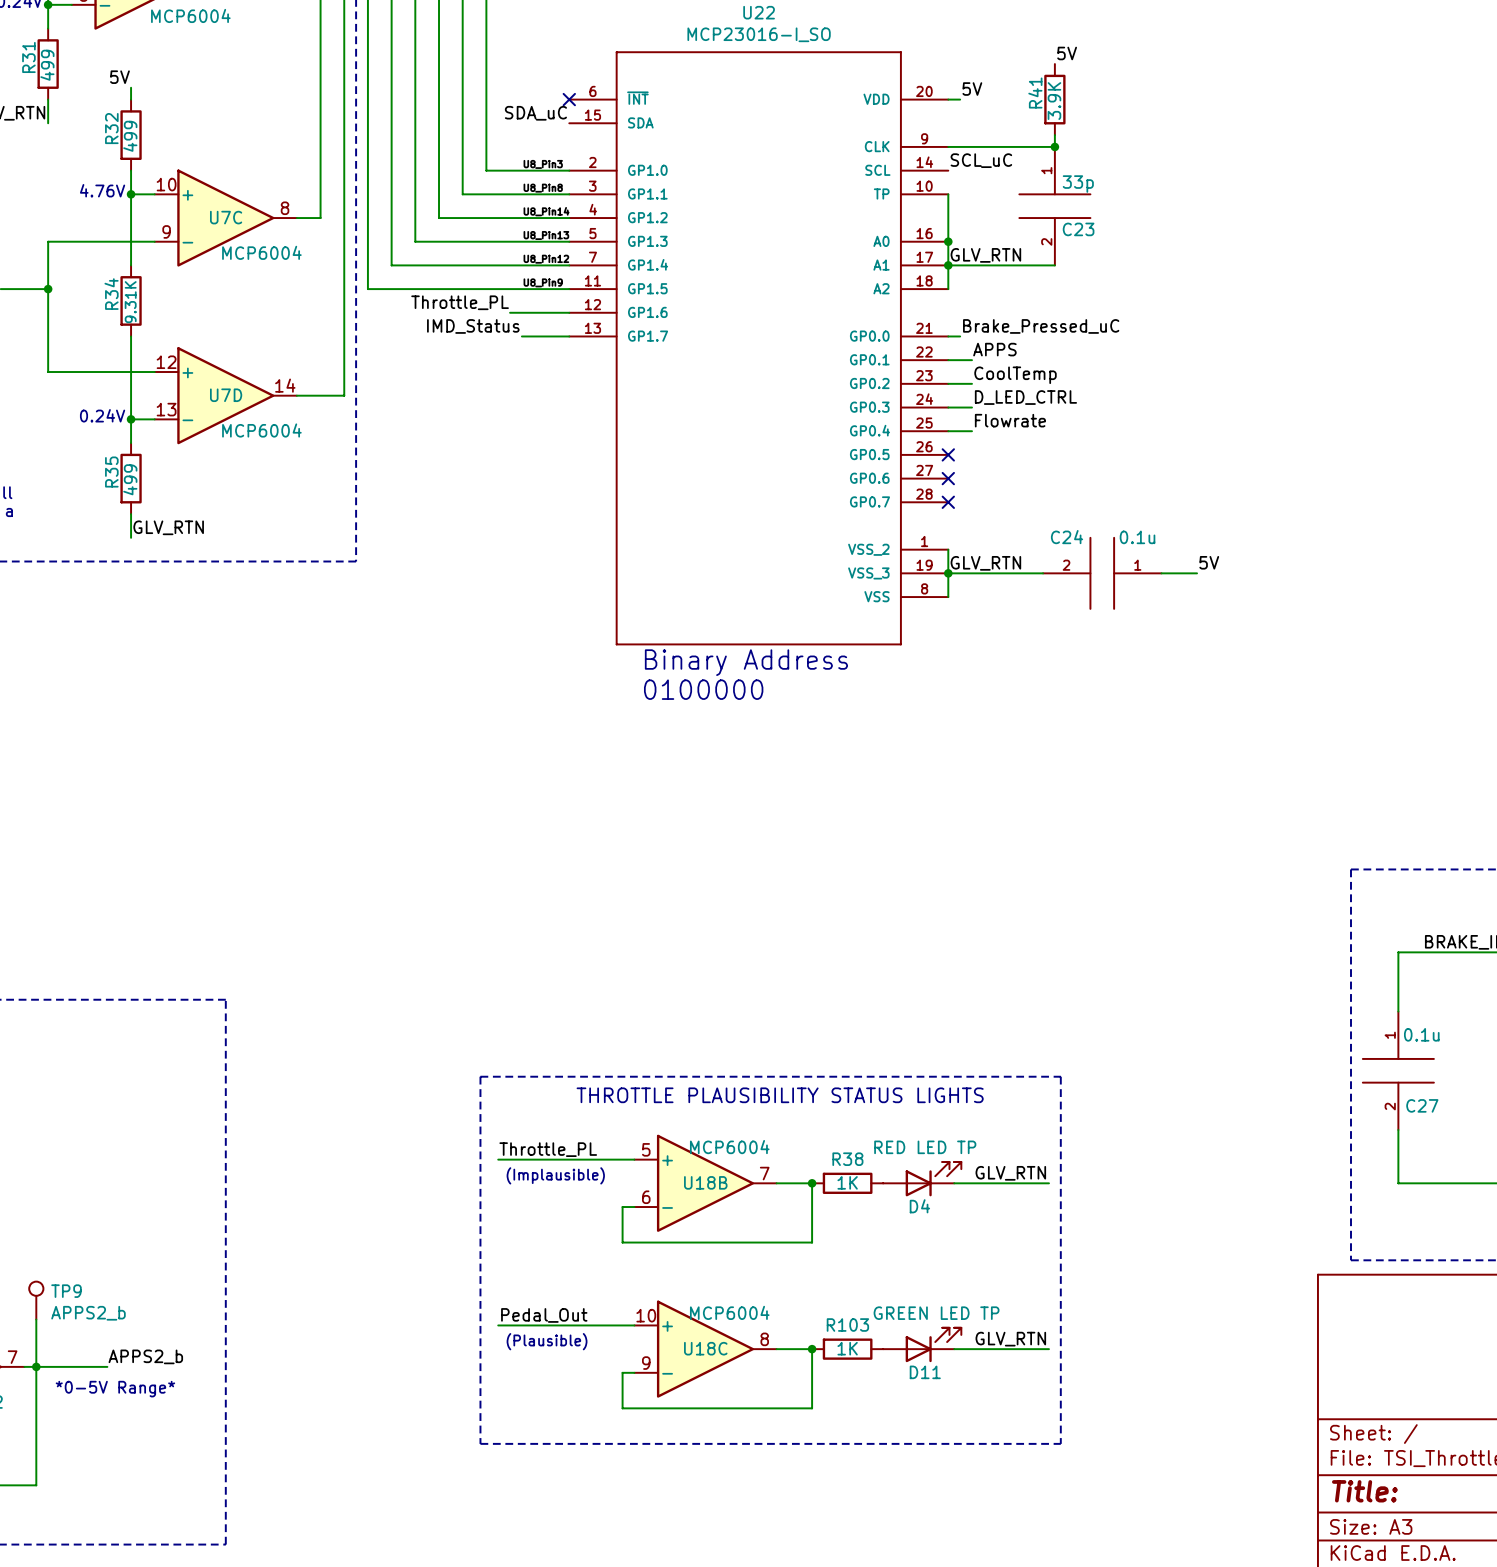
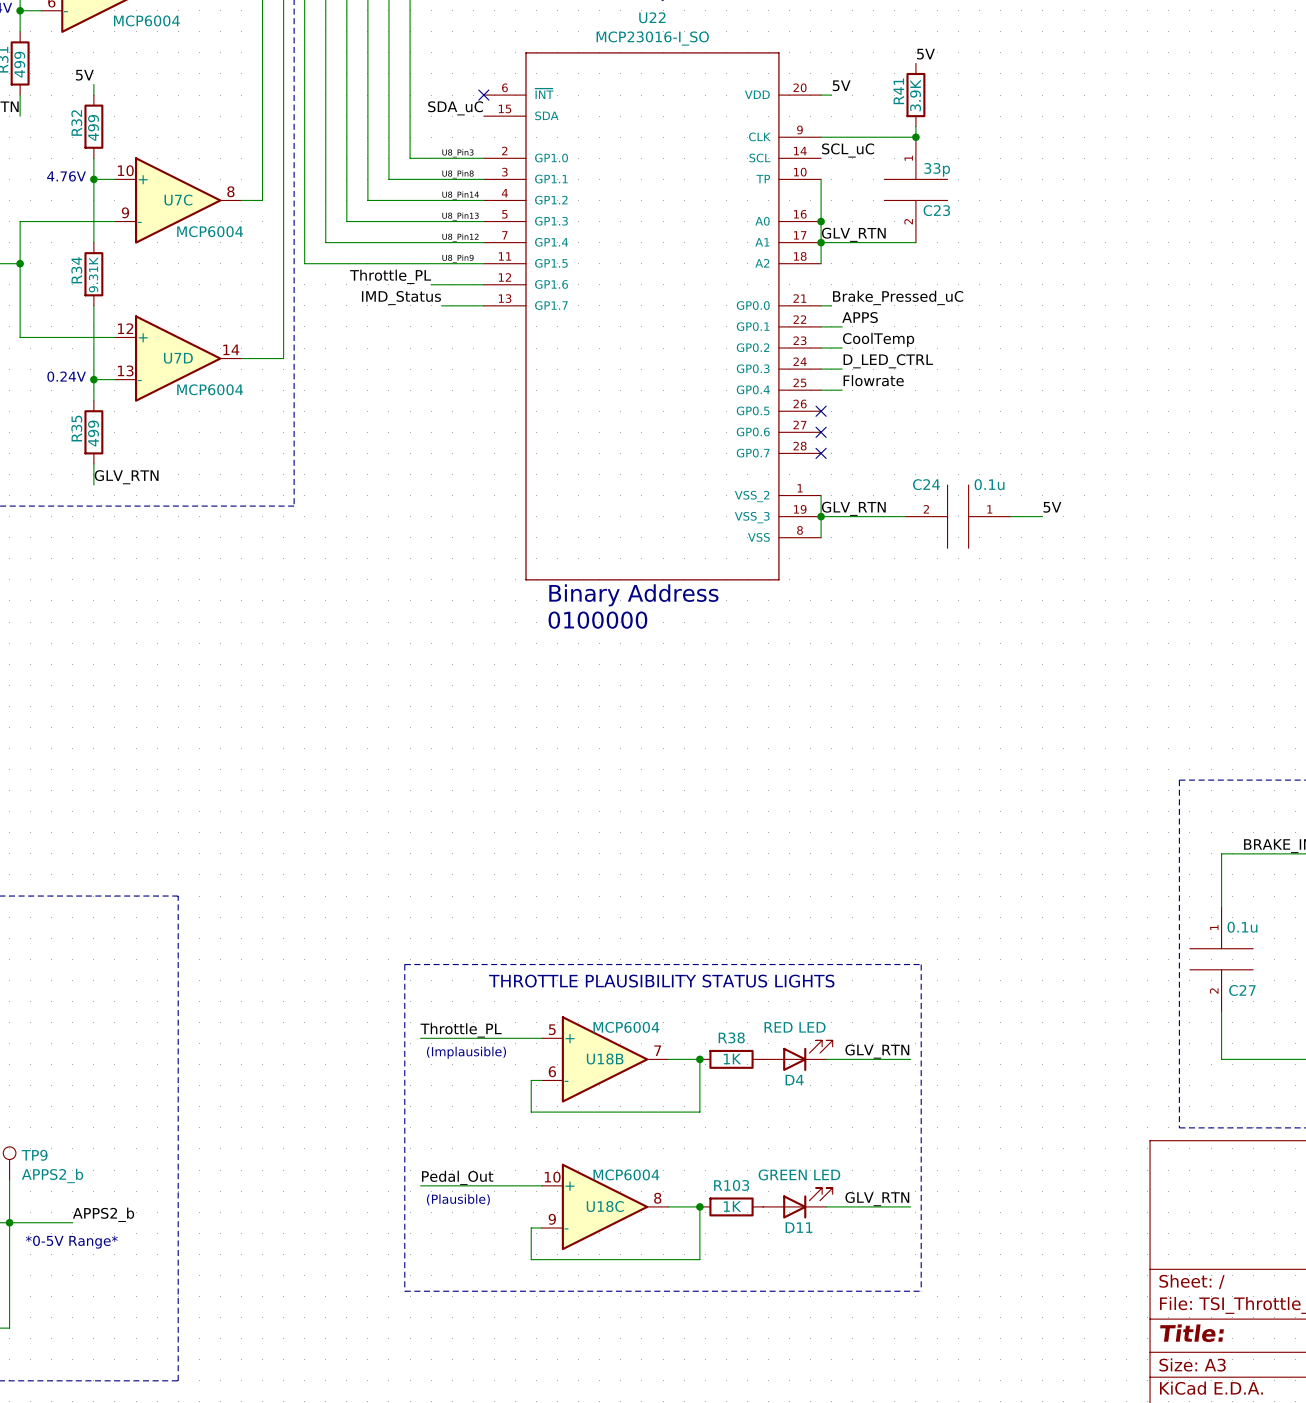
D4 value: RED LED TP (925, 1147) -> RED LED (795, 1027)
D11 value: GREEN LED TP (936, 1313) -> GREEN LED (799, 1174)

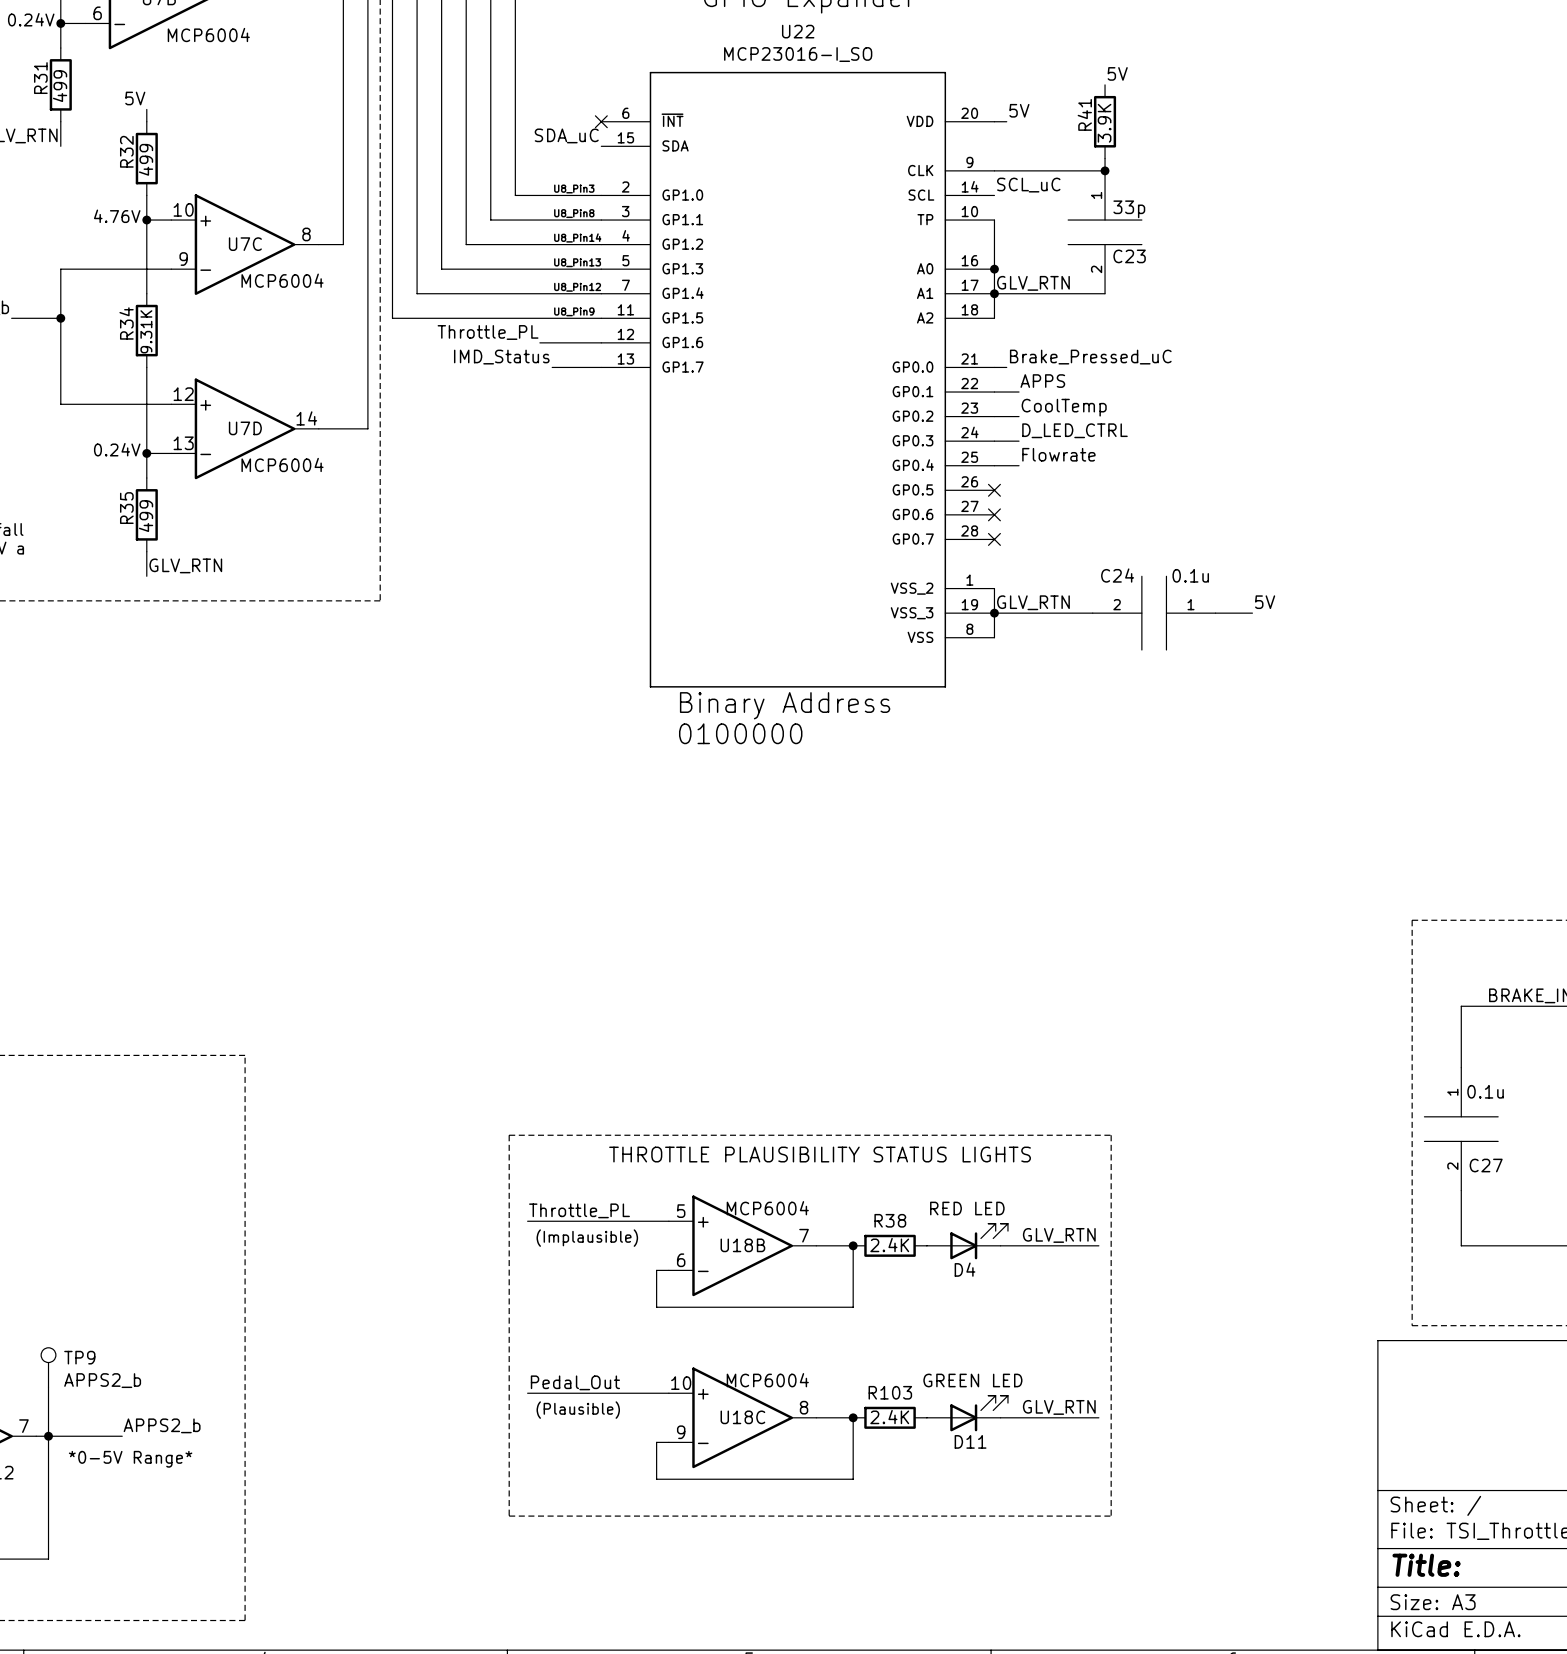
R38 value: 1K (732, 1058) -> 2.4K (889, 1245)
R103 value: 1K (732, 1206) -> 2.4K (889, 1417)

